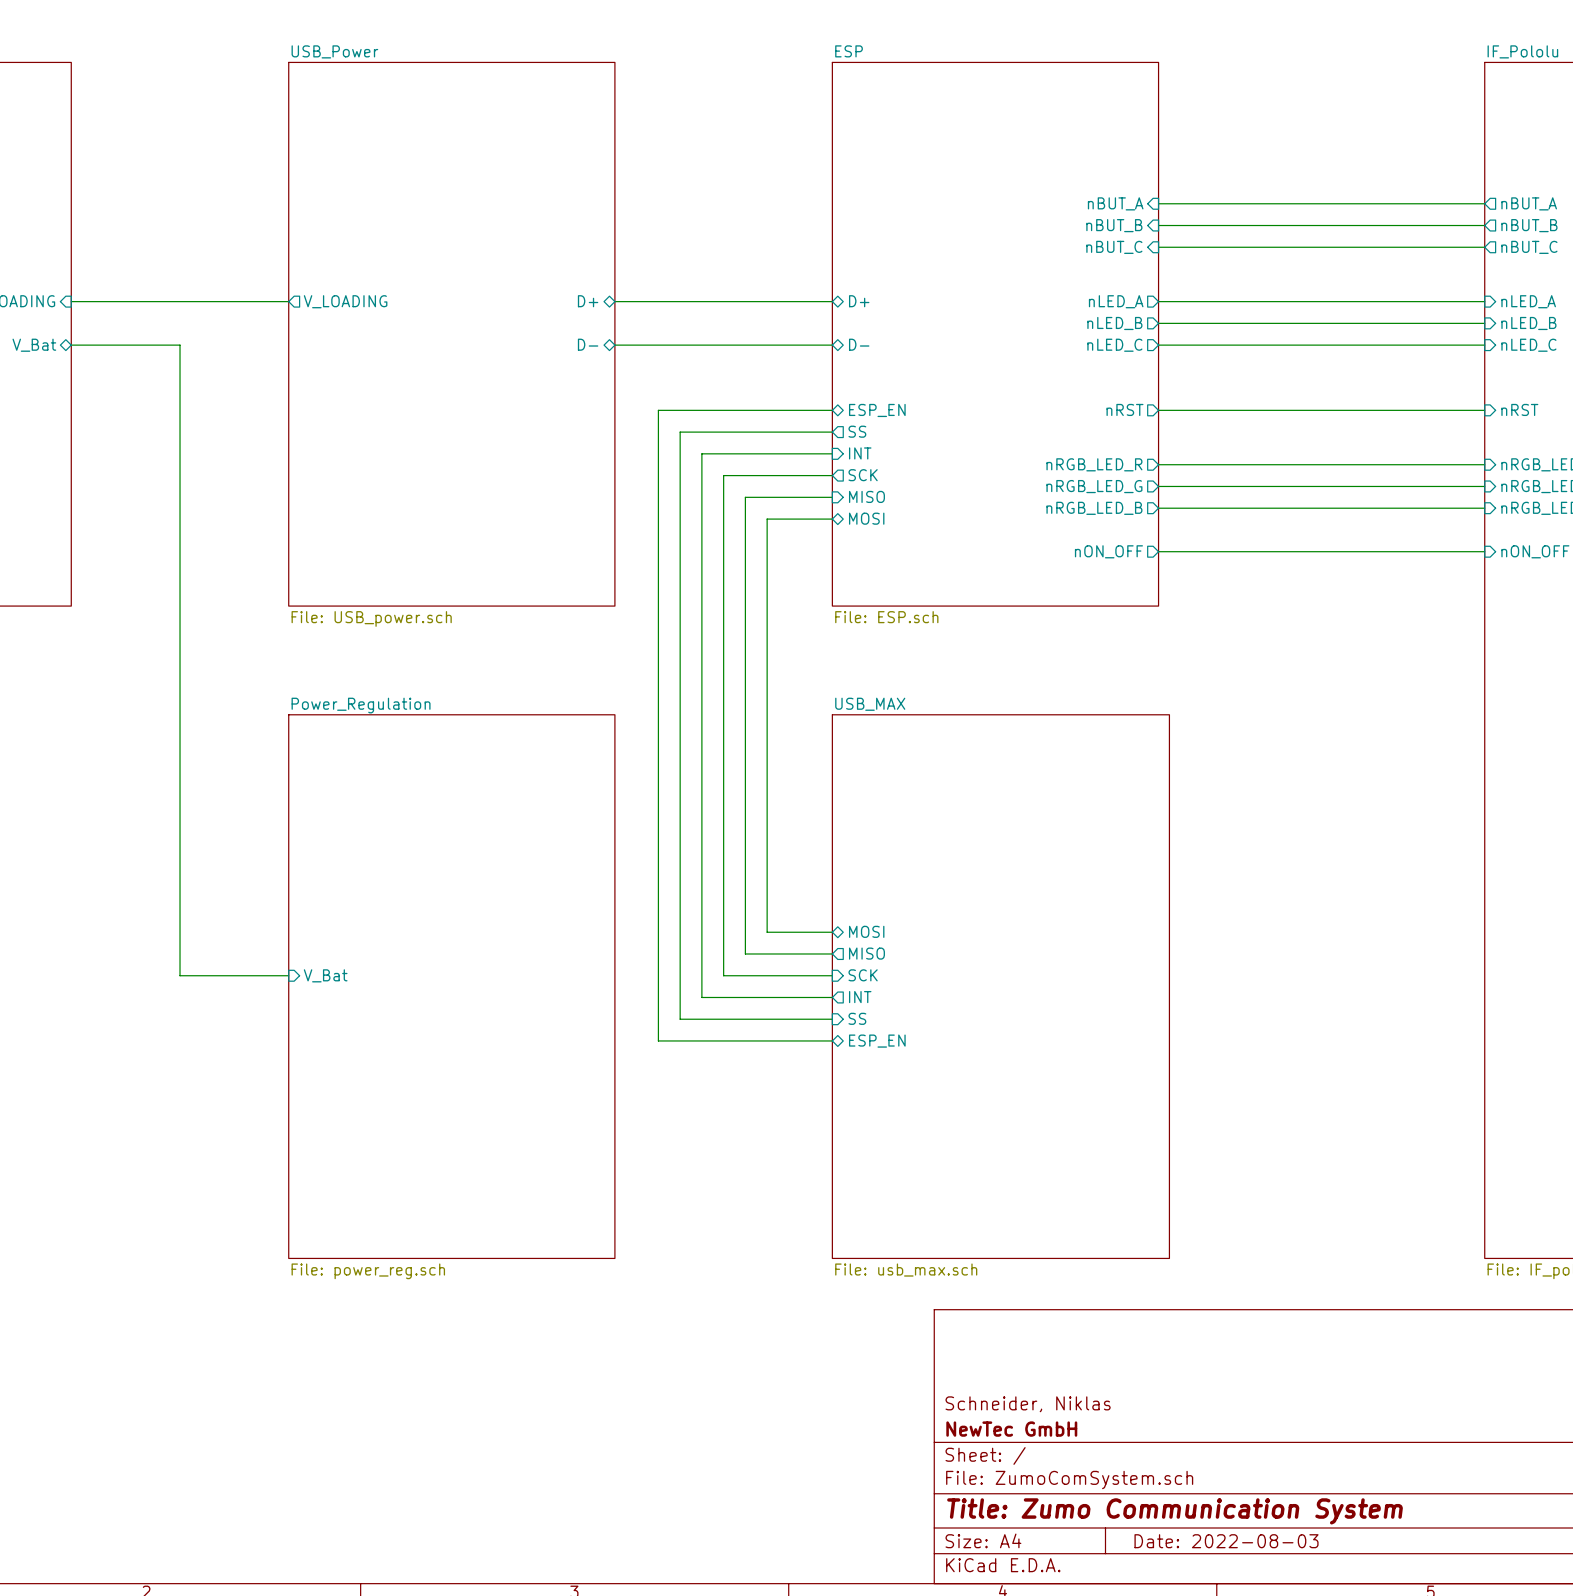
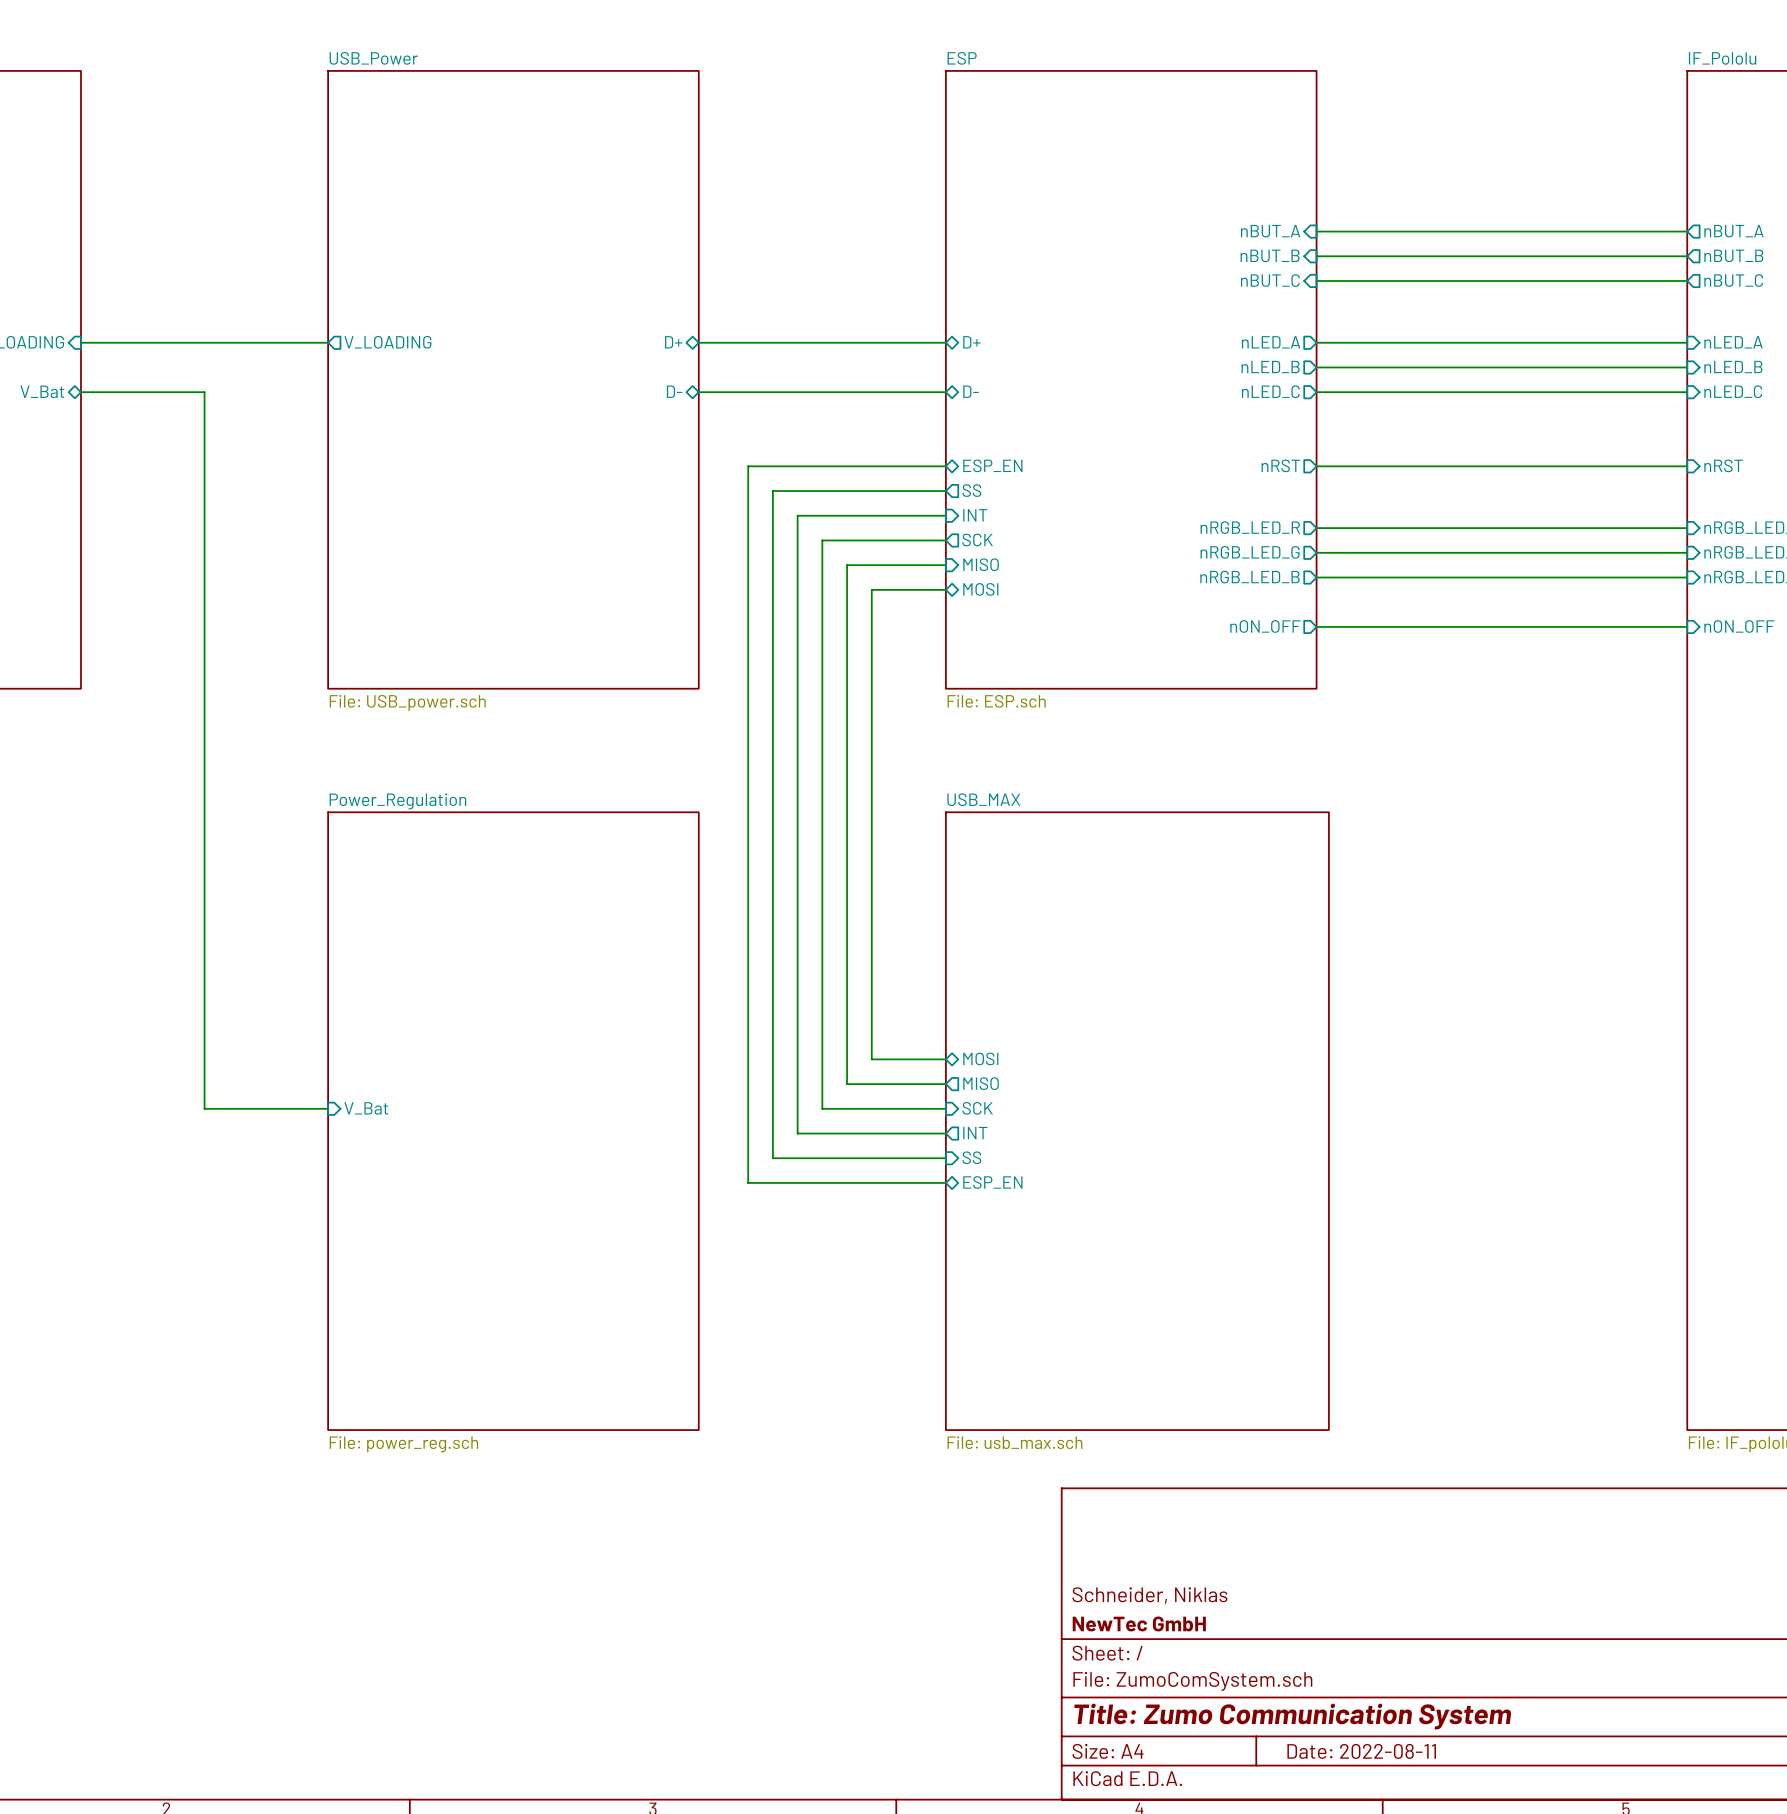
title block: Date: 2022-08-03 (1226, 1541) -> Date: 2022-08-11 (1361, 1751)

